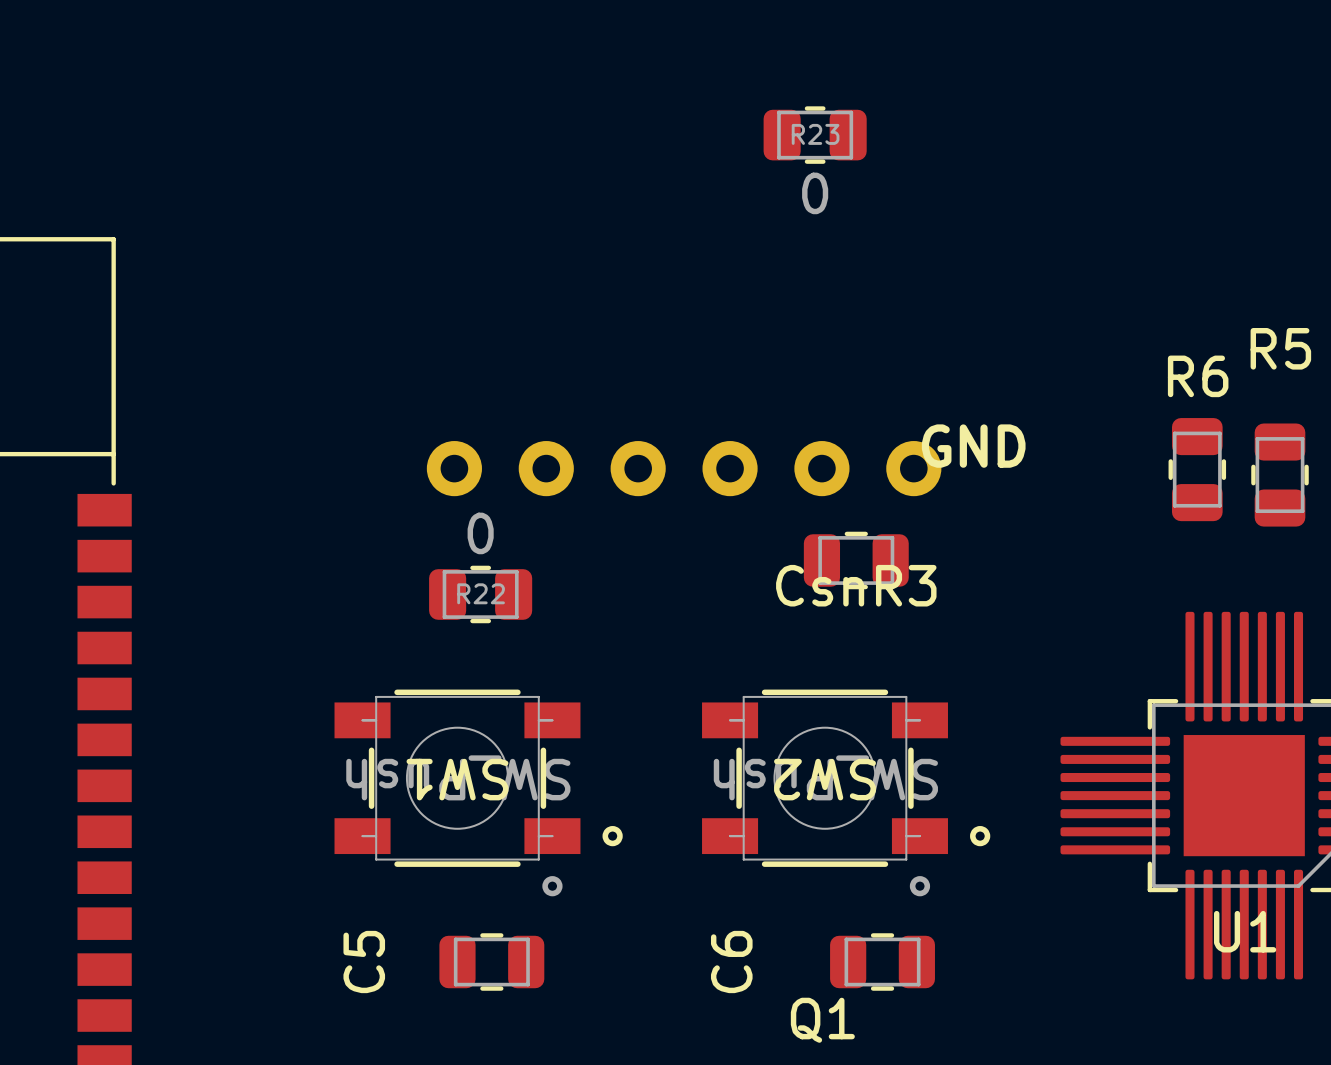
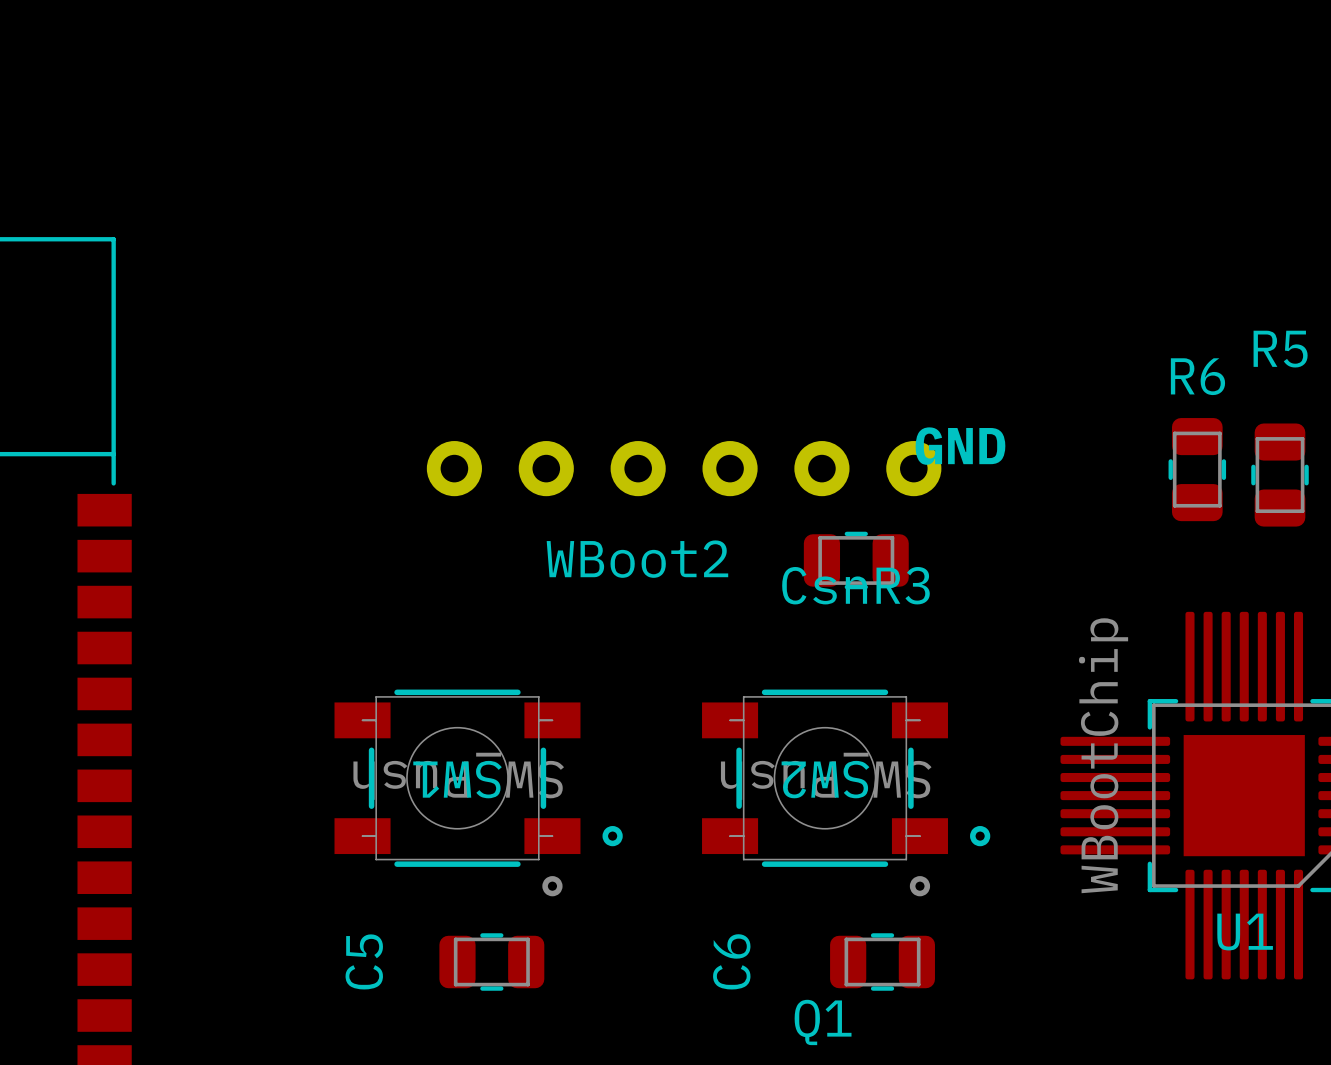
R23: 0 (815, 135) -> none
WBoot2 name: none -> WBoot2 (637, 559)
R22: 0 (480, 594) -> none
U1 value: none -> WBootChip (1103, 755)

